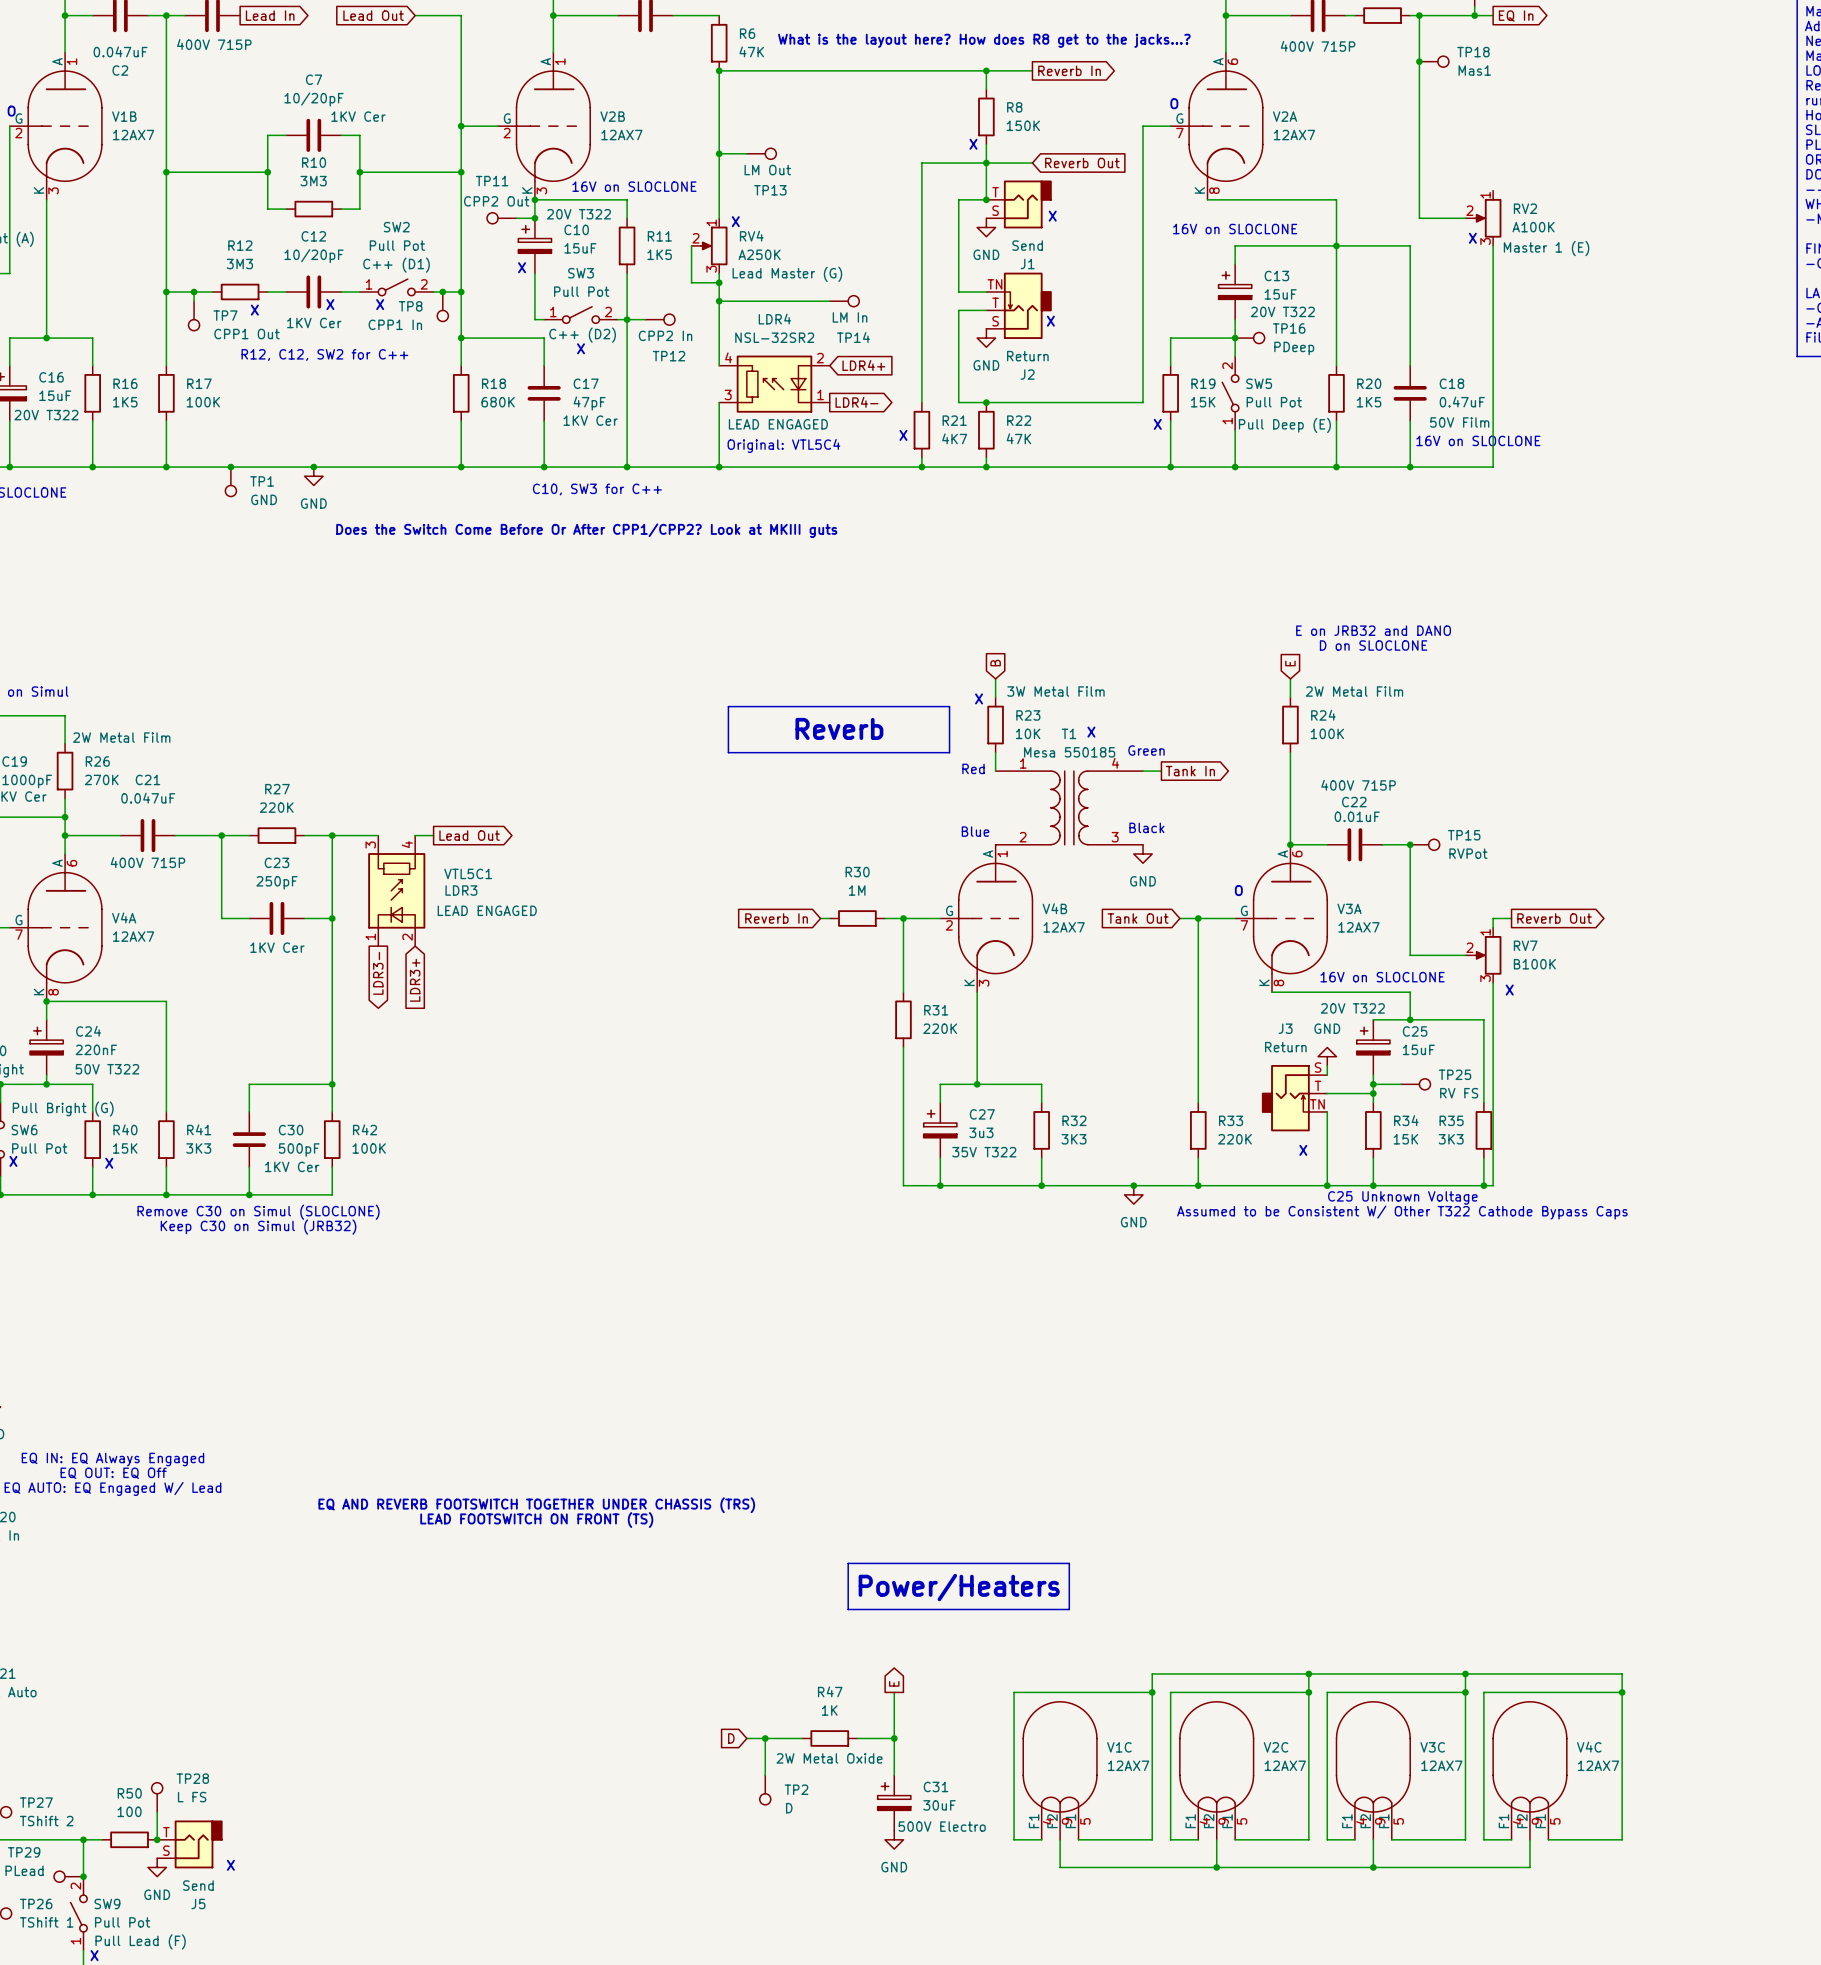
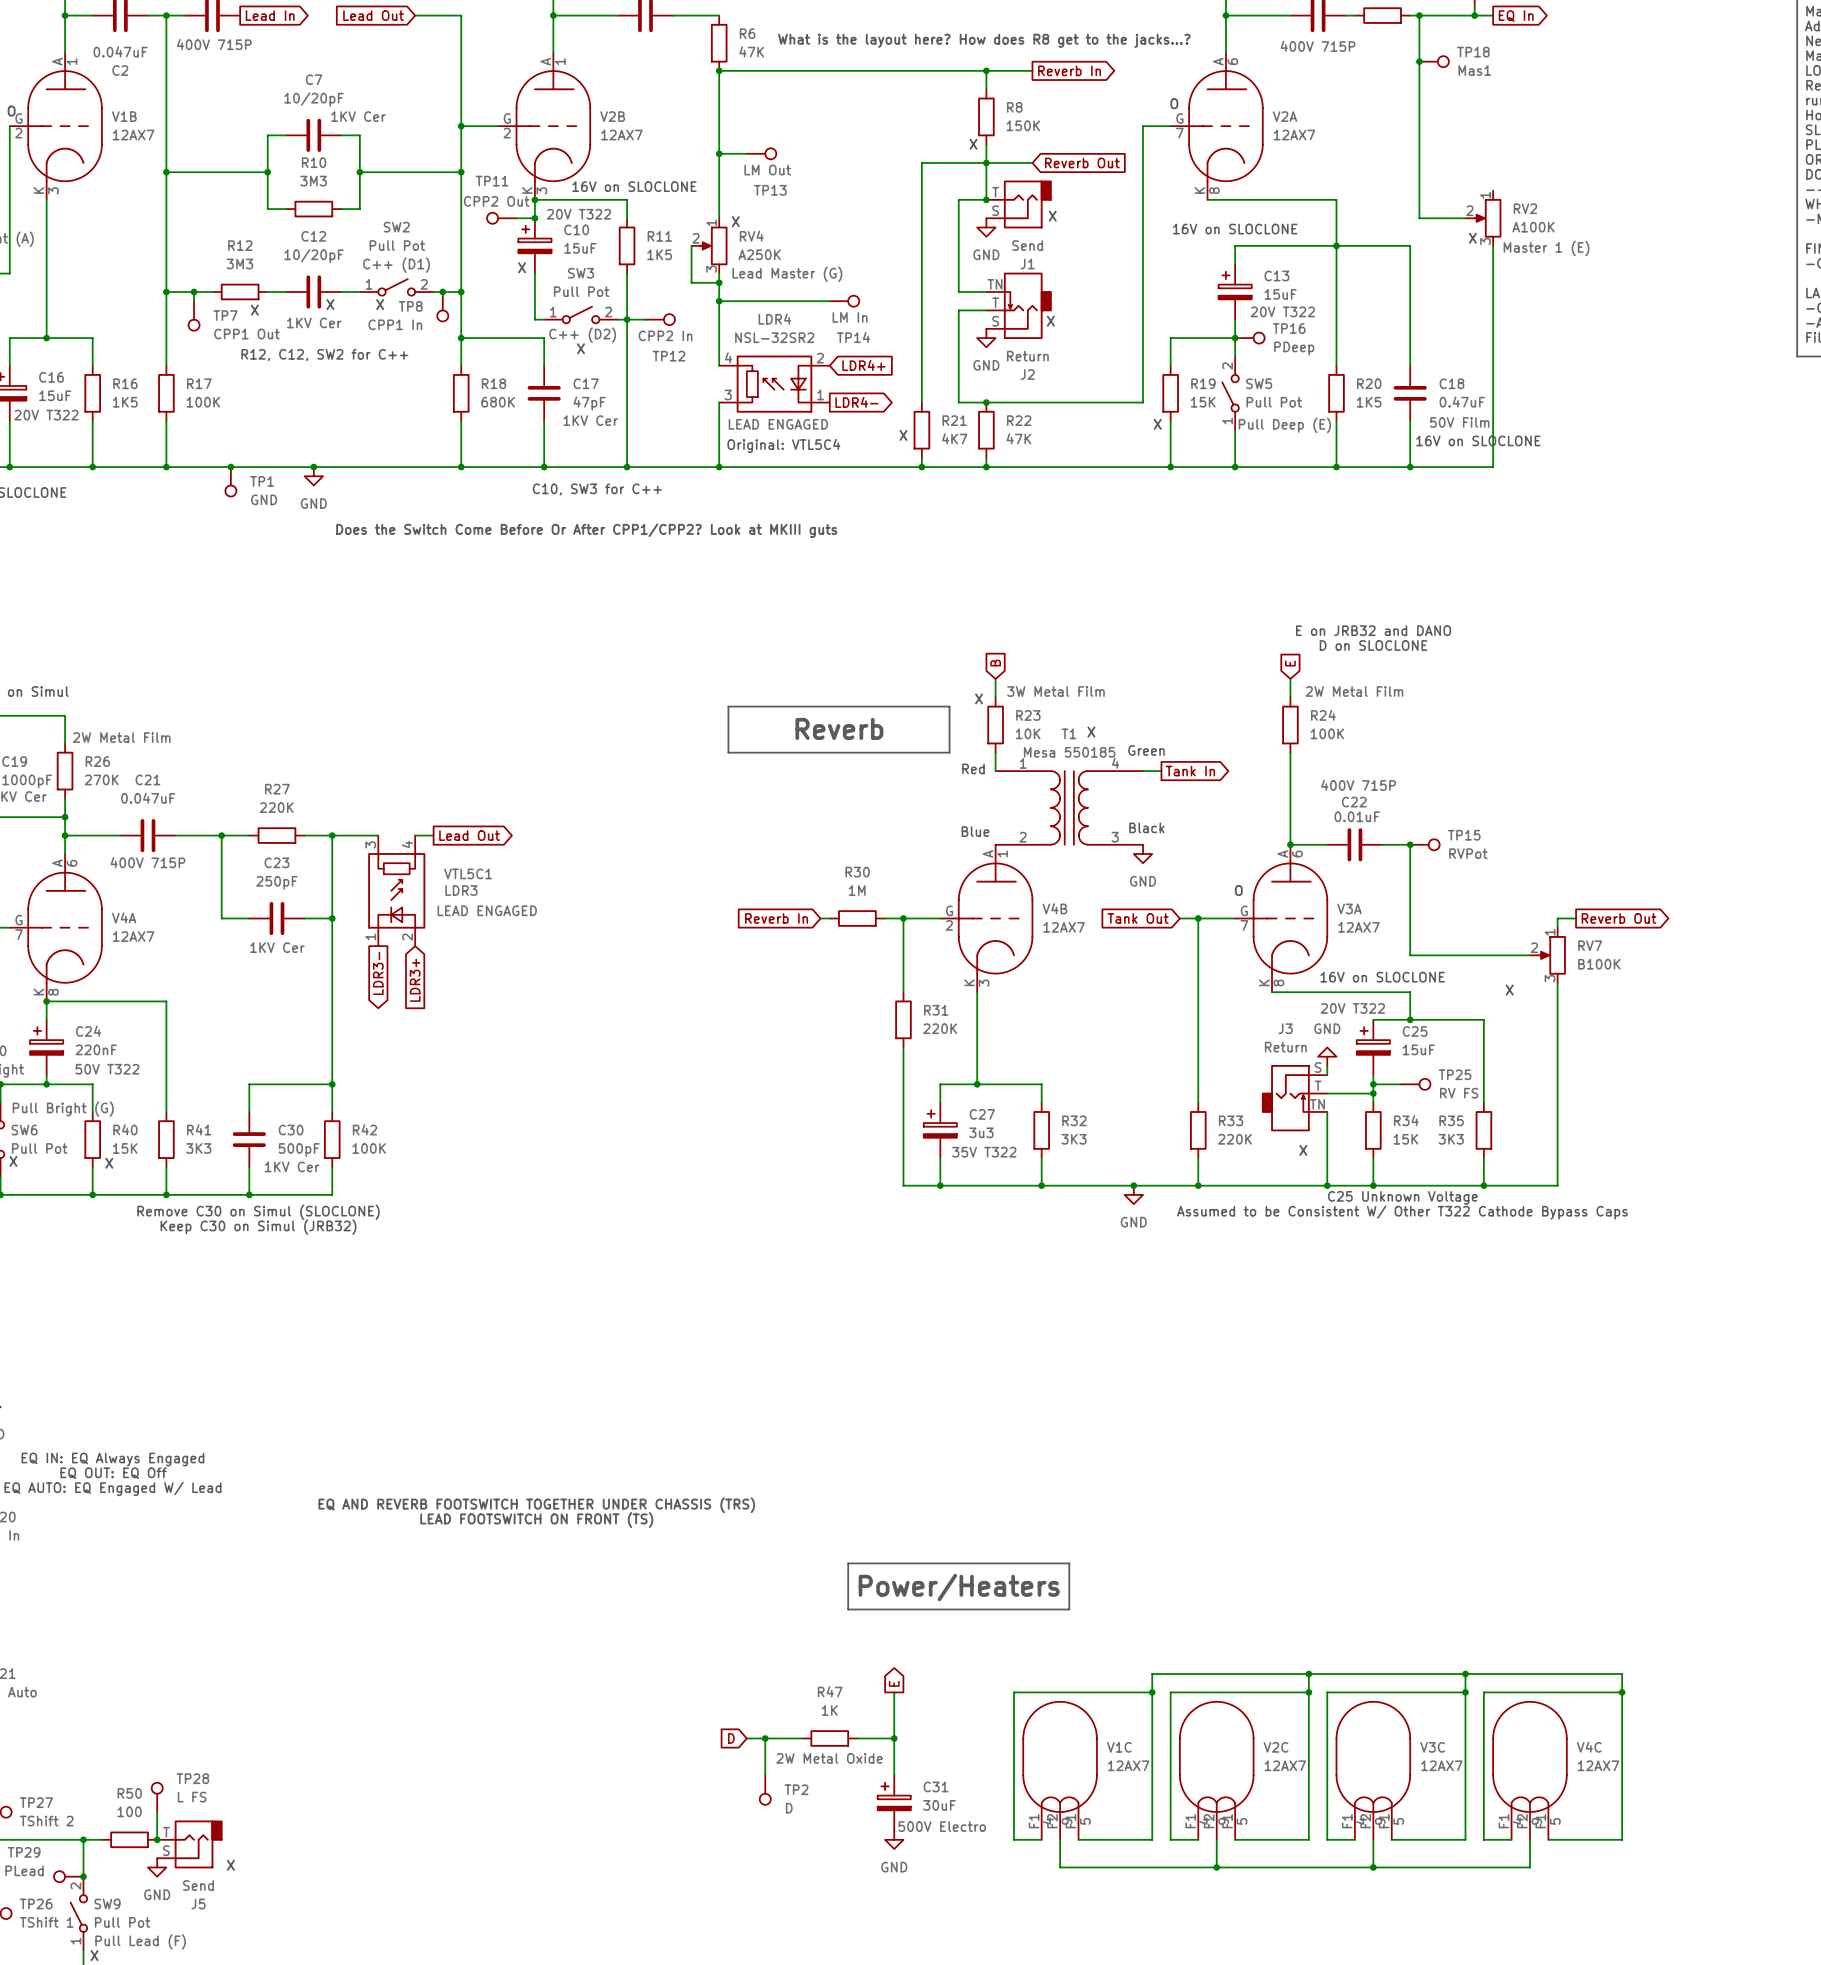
wire: (1511, 918) (1493, 918) (1493, 927) -> (1576, 918) (1557, 918) (1557, 927)
global label position: Reverb Out (1554, 918) -> Reverb Out (1619, 918)
wire: none -> (1465, 955) (1529, 955)
RV7 position: (1483, 955) -> (1547, 955)
wire: (1493, 982) (1493, 1185) -> (1557, 982) (1557, 1185) (1493, 1185)

